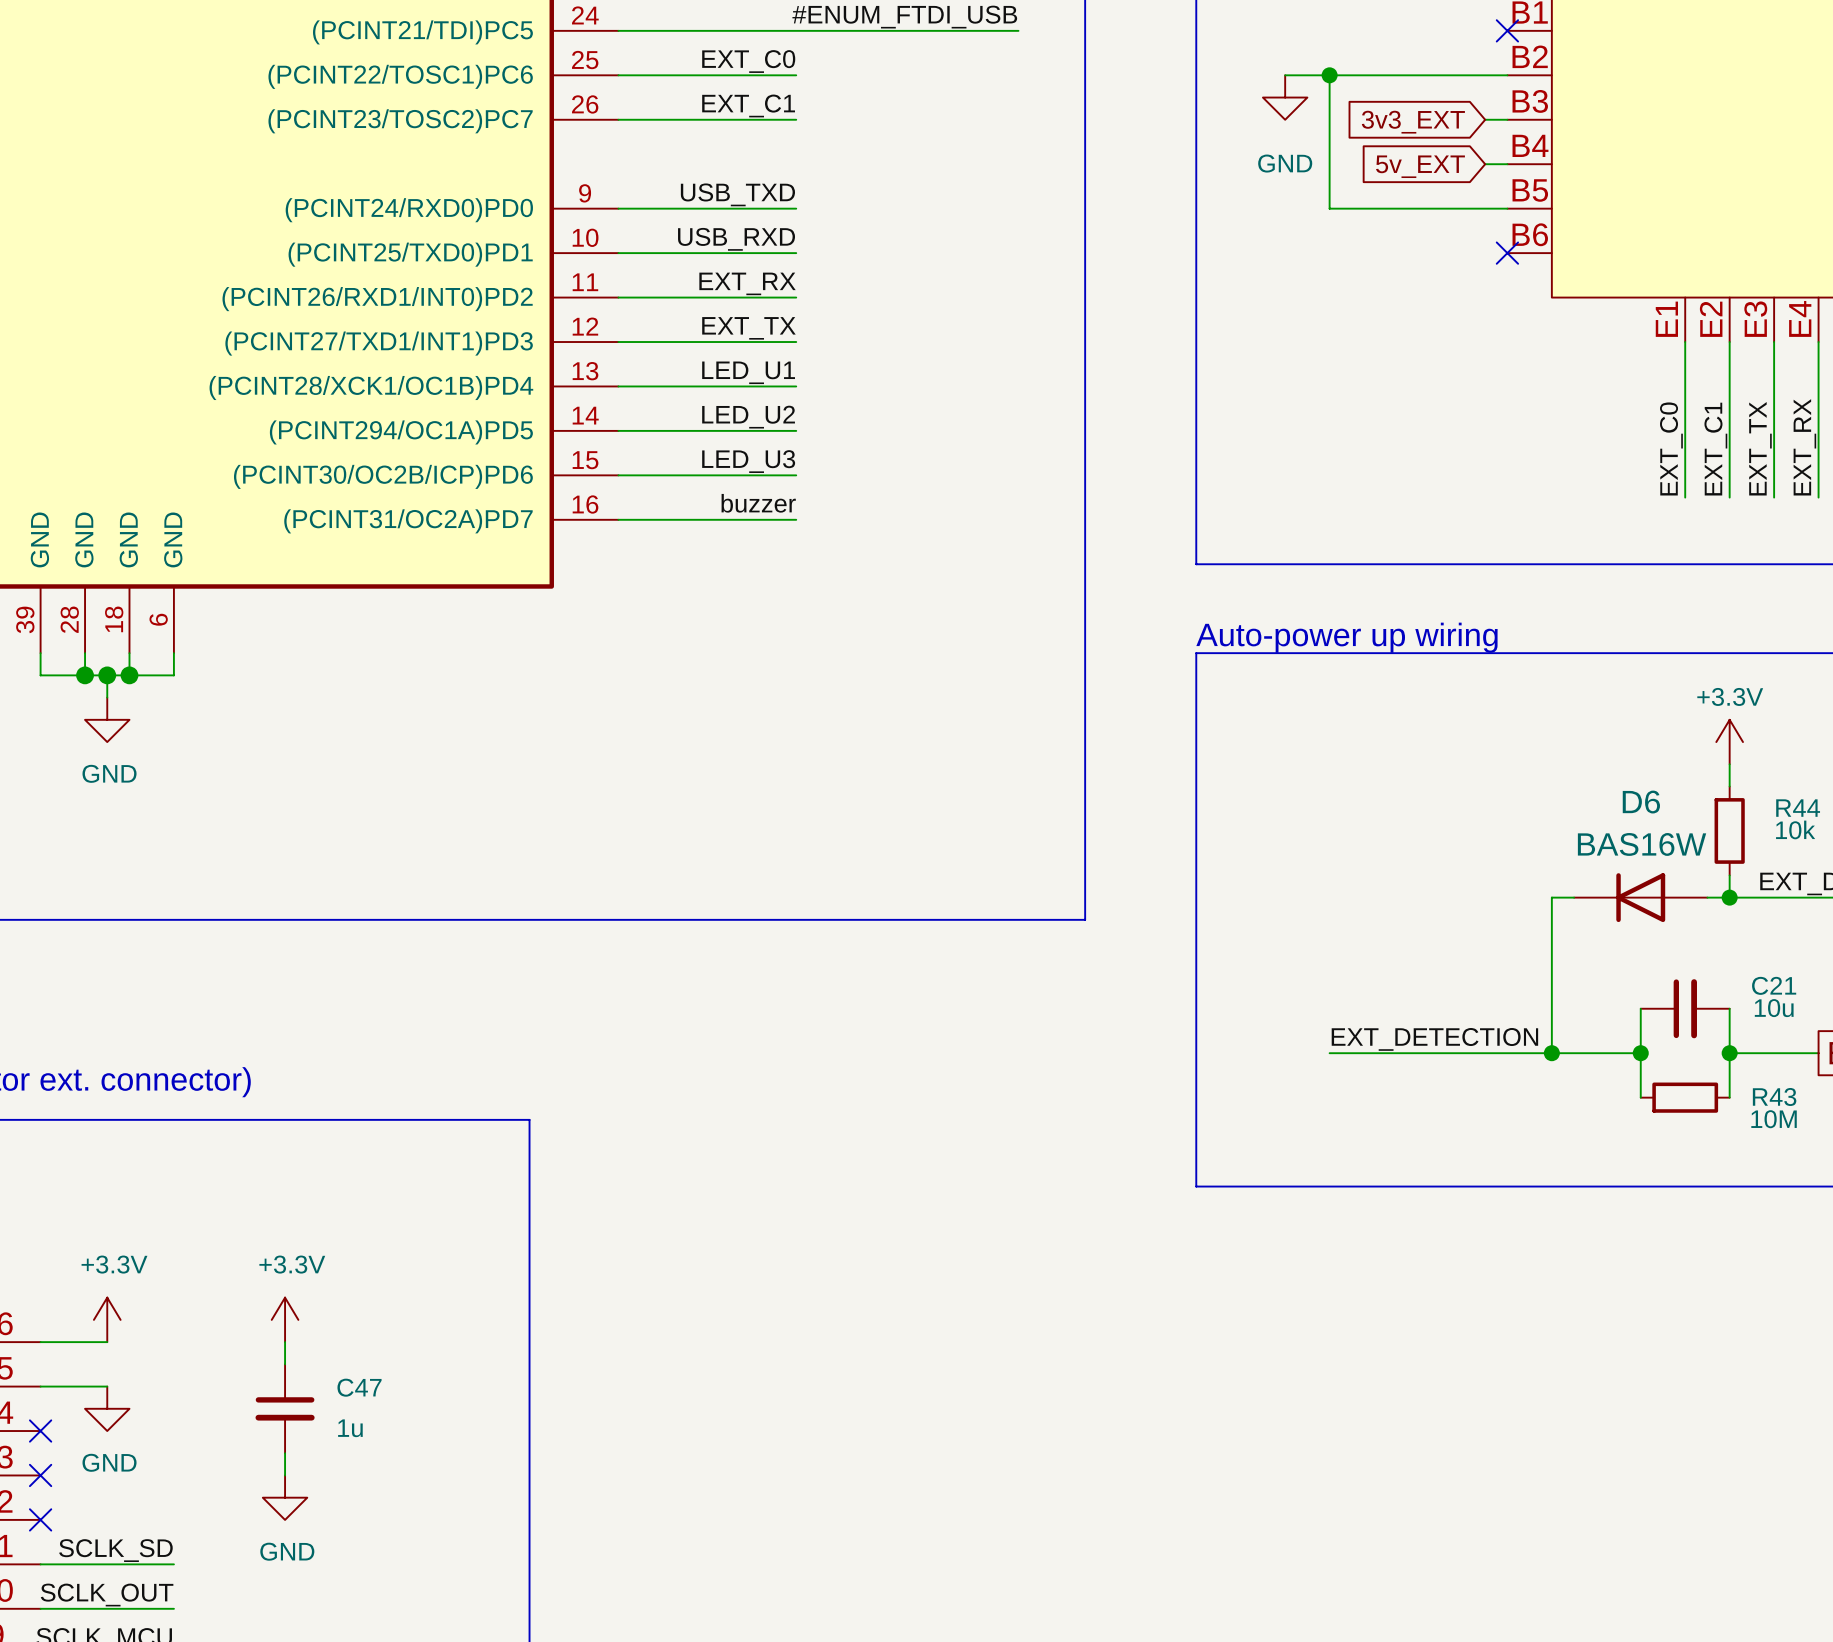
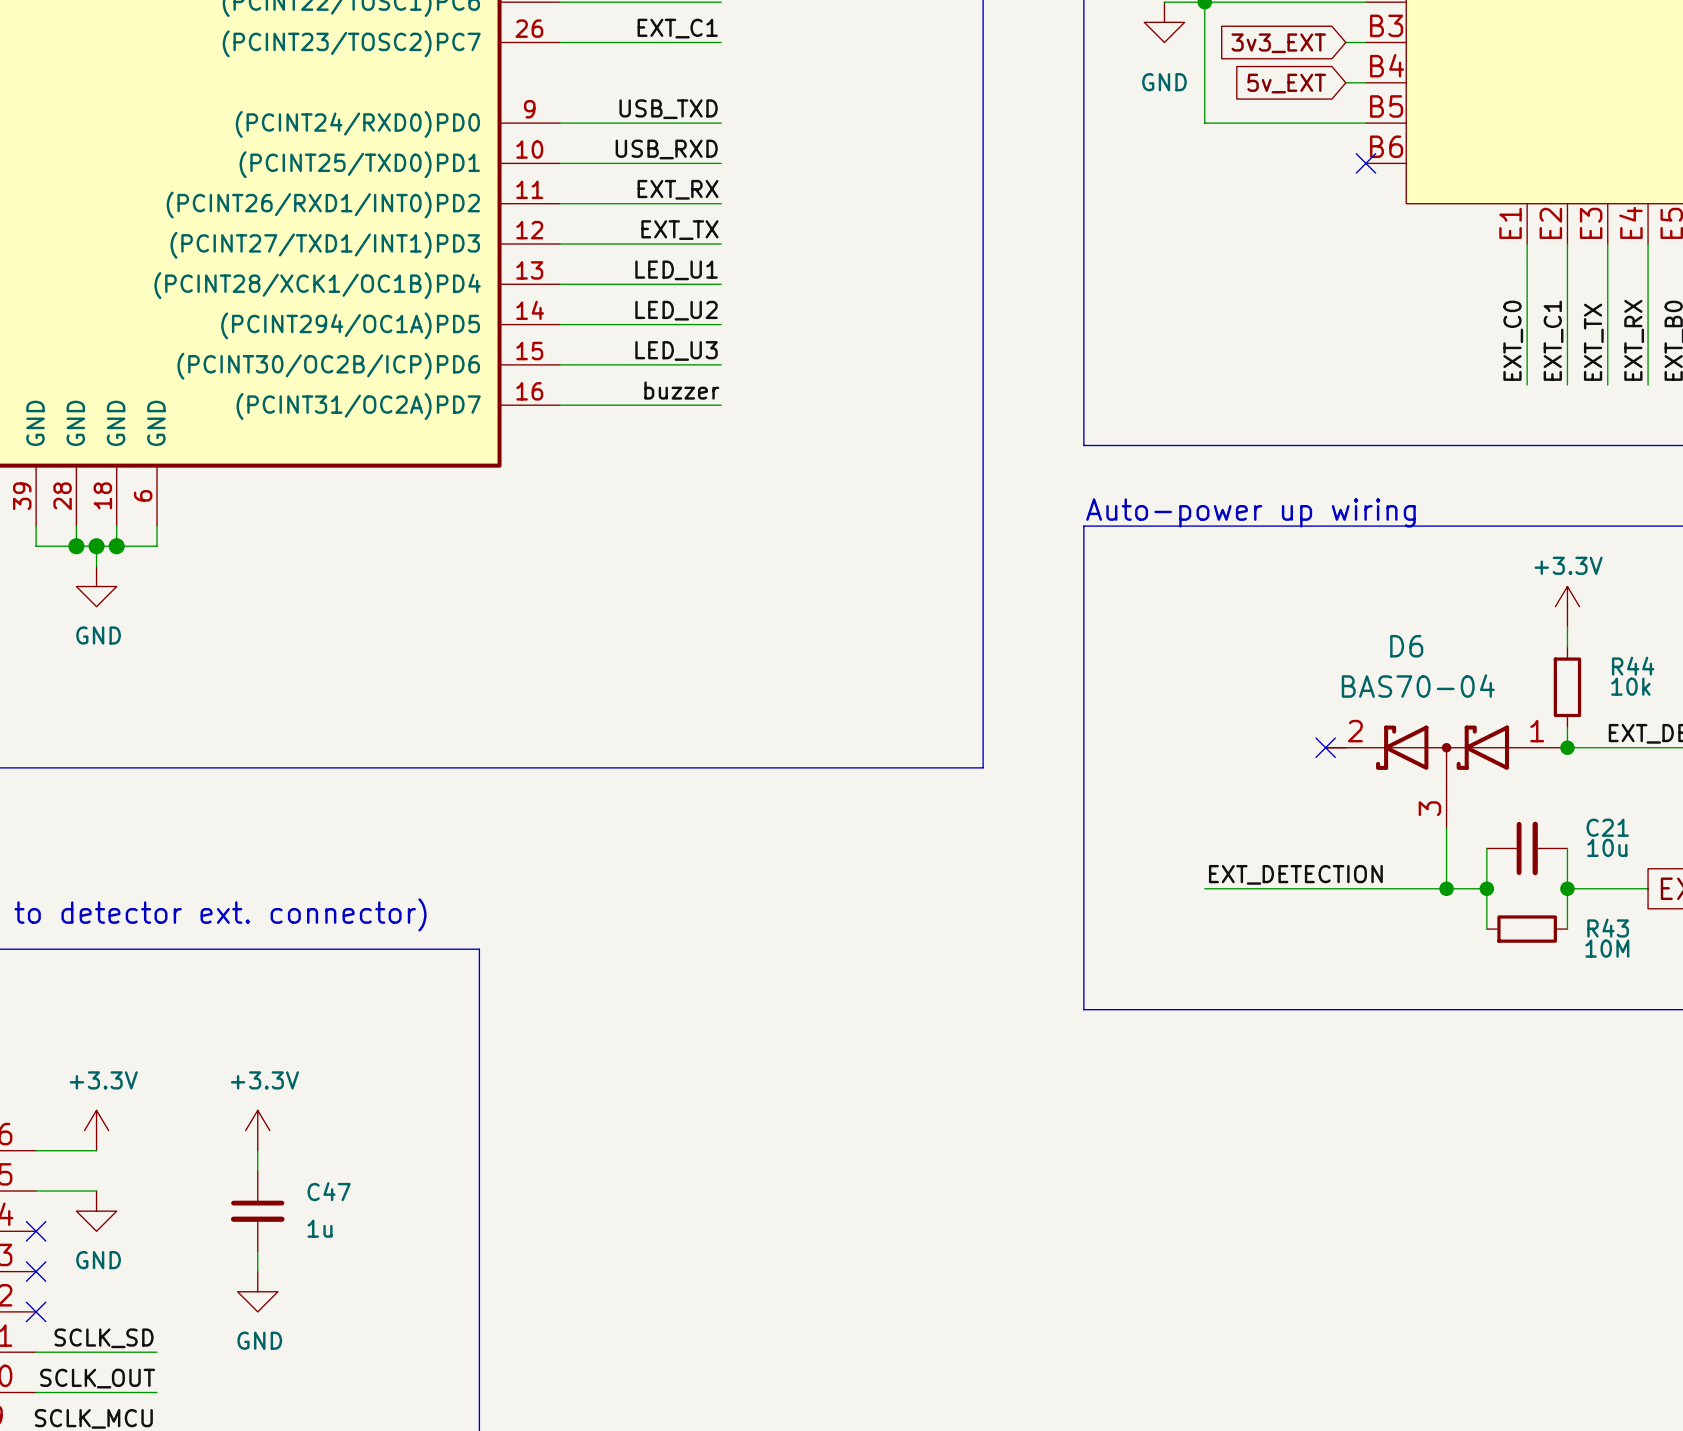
D6 name position: D6 (1641, 802) -> D6 (1406, 646)
D6 value: BAS16W (1642, 844) -> BAS70-04 (1418, 686)
D6 symbol: [1574, 873, 1708, 923] -> [1325, 725, 1568, 829]
no-connect mark: none -> (1325, 747)
wire: (1574, 897) (1551, 897) (1551, 1053) -> none
wire: none -> (1446, 828) (1446, 888)
junction position: (1551, 1053) -> (1446, 888)

